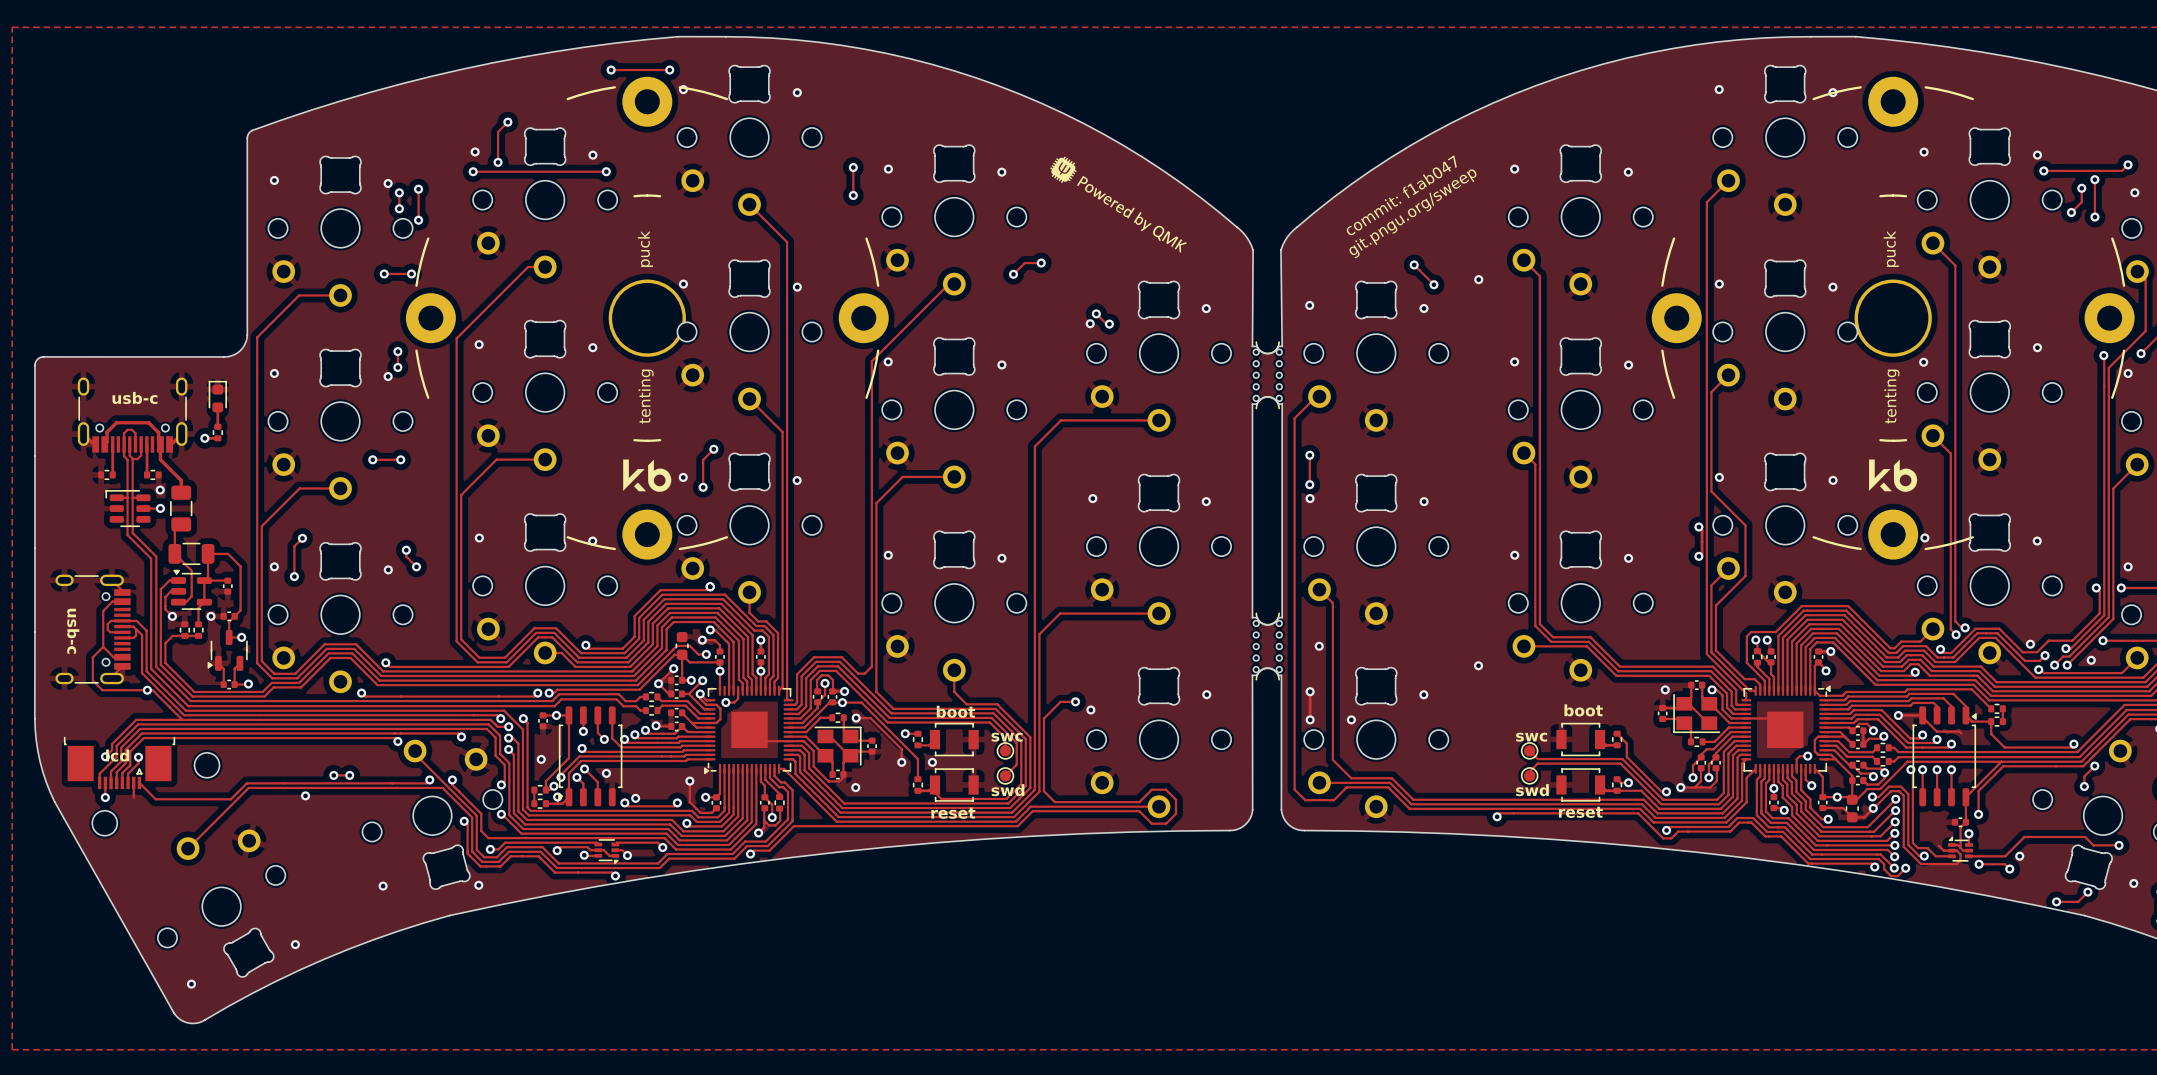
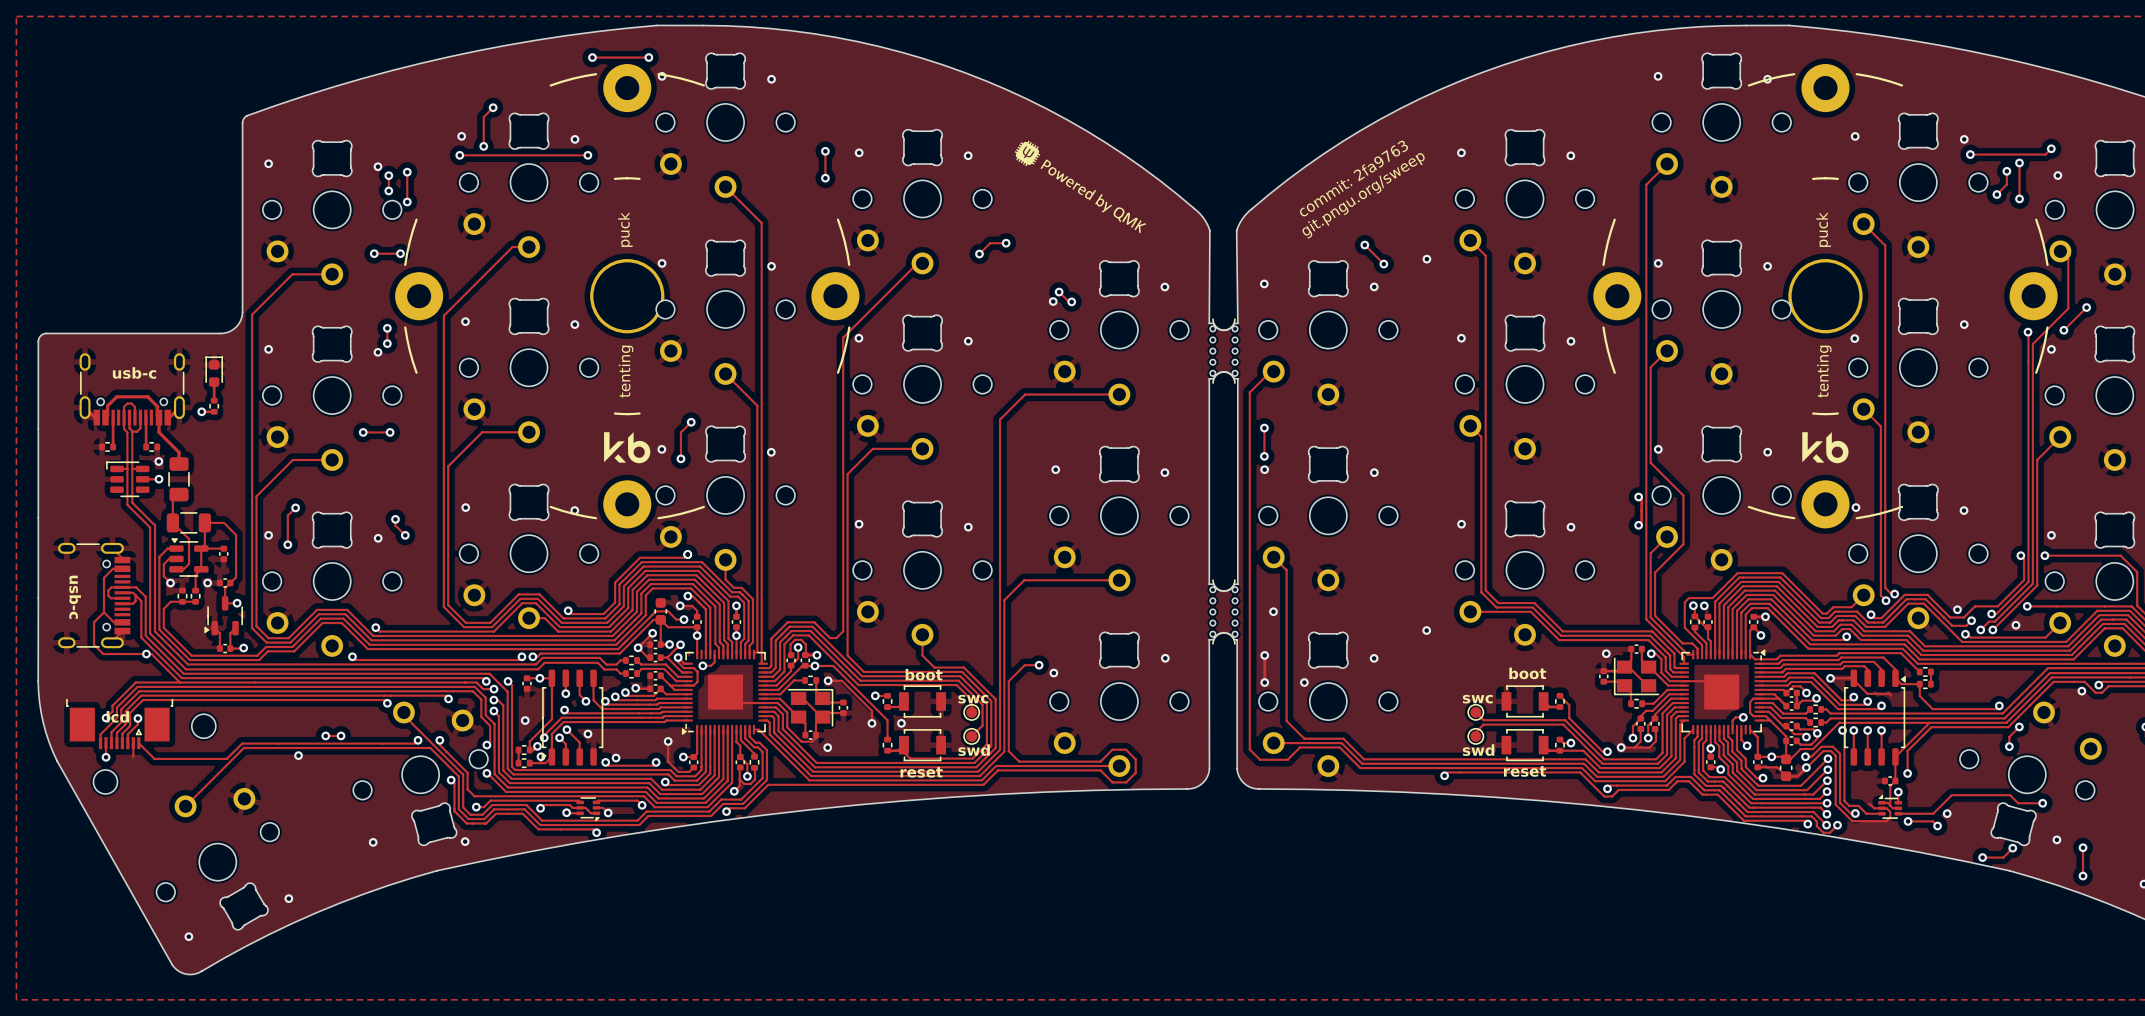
text: commit: f1ab047 (1401, 195) -> commit: 2fa9763 (1354, 178)

